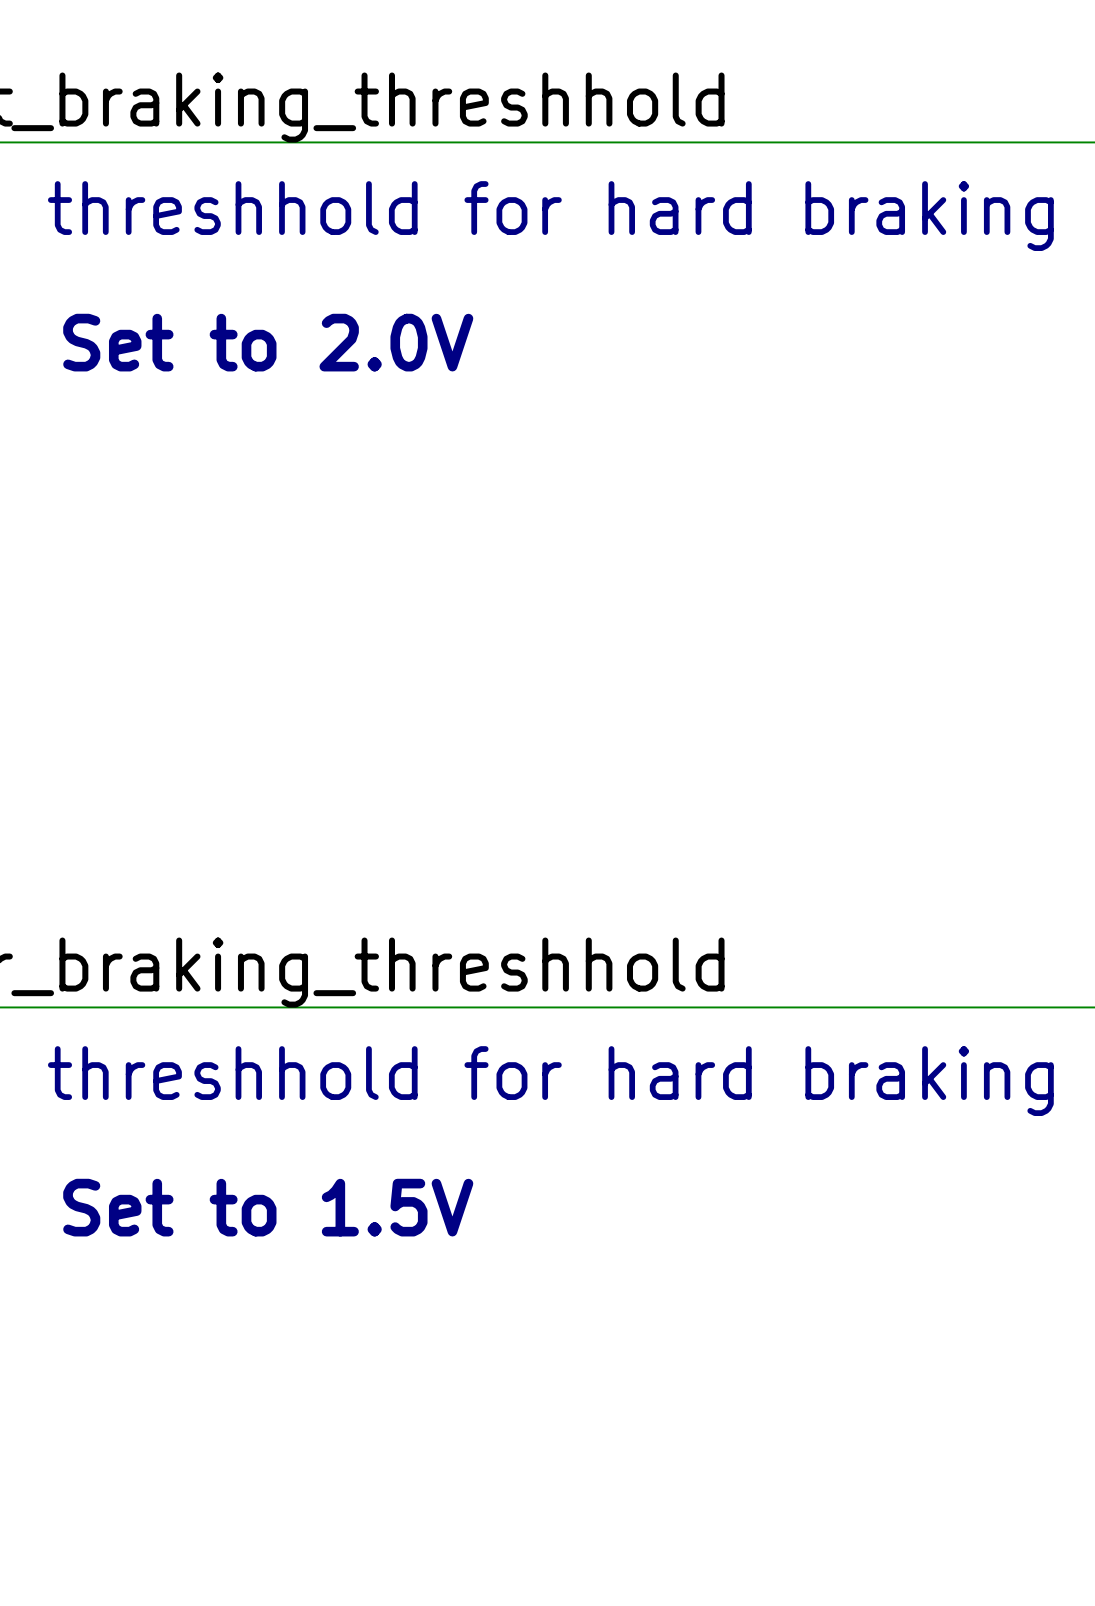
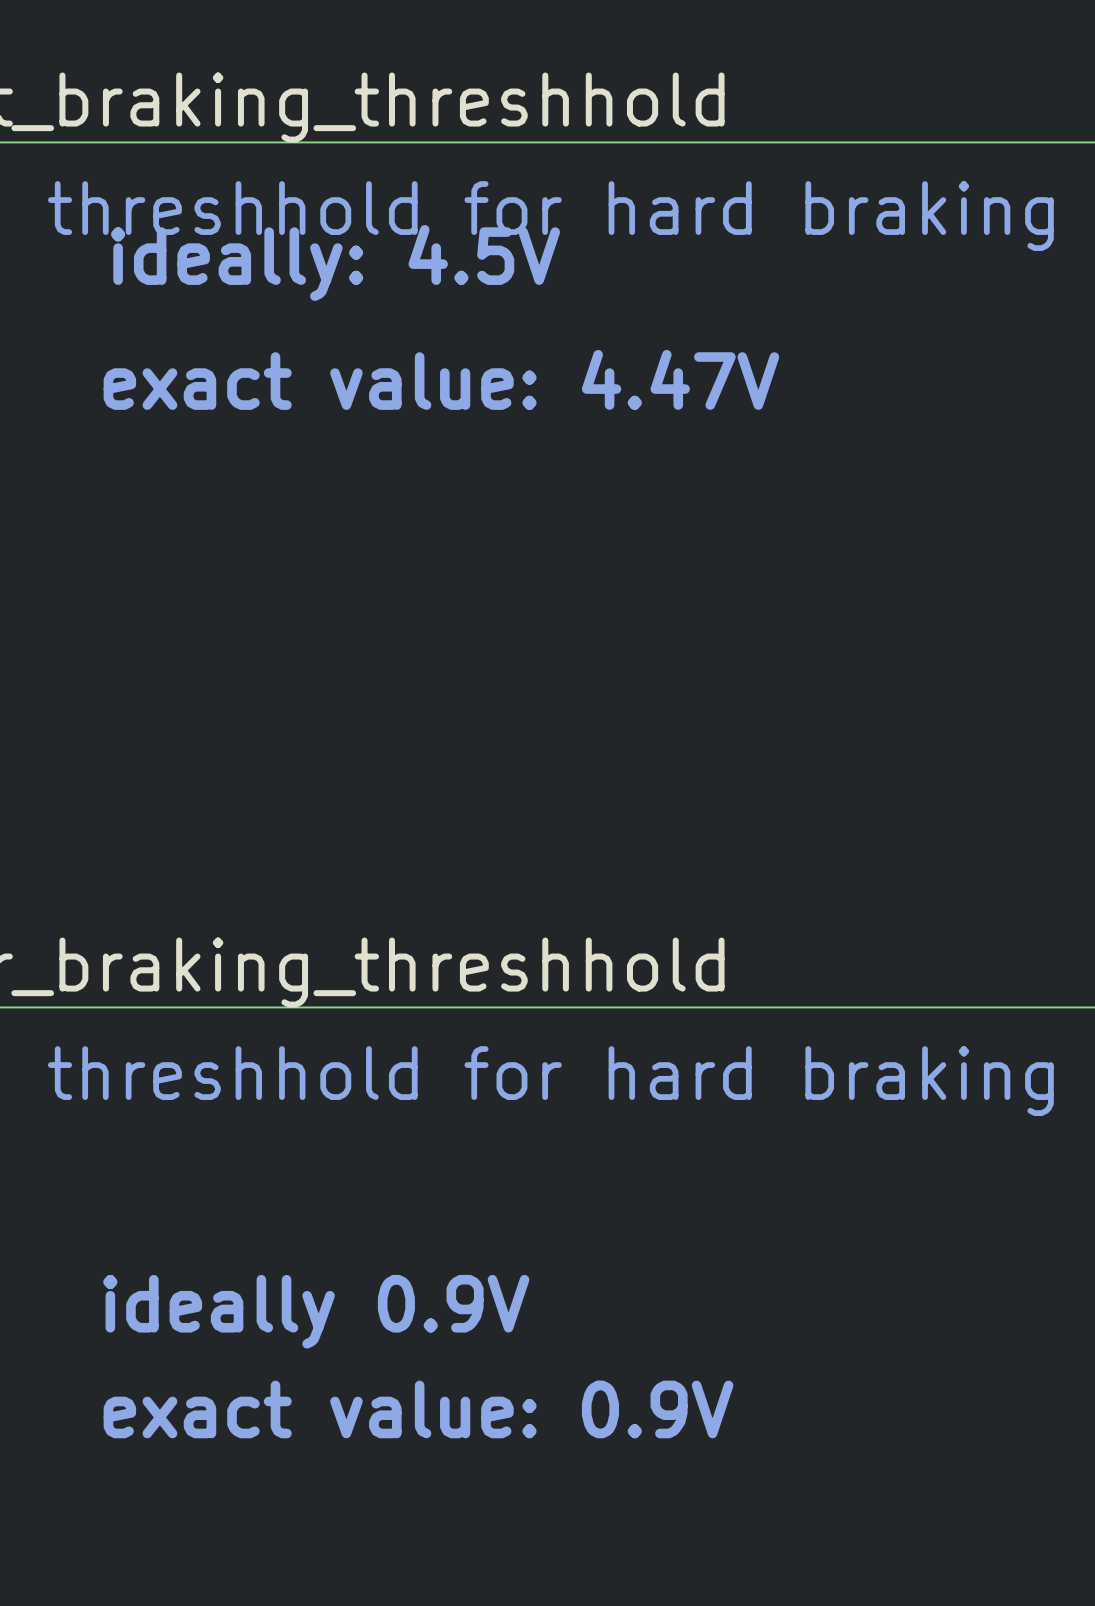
text: none -> ideally: 4.5V (335, 262)
text: Set to 2.0V (268, 342) -> none
text: none -> exact value: 4.47V (441, 379)
text: Set to 1.5V (268, 1207) -> none
text: none -> ideally 0.9V (316, 1311)
text: none -> exact value: 0.9V (418, 1409)

